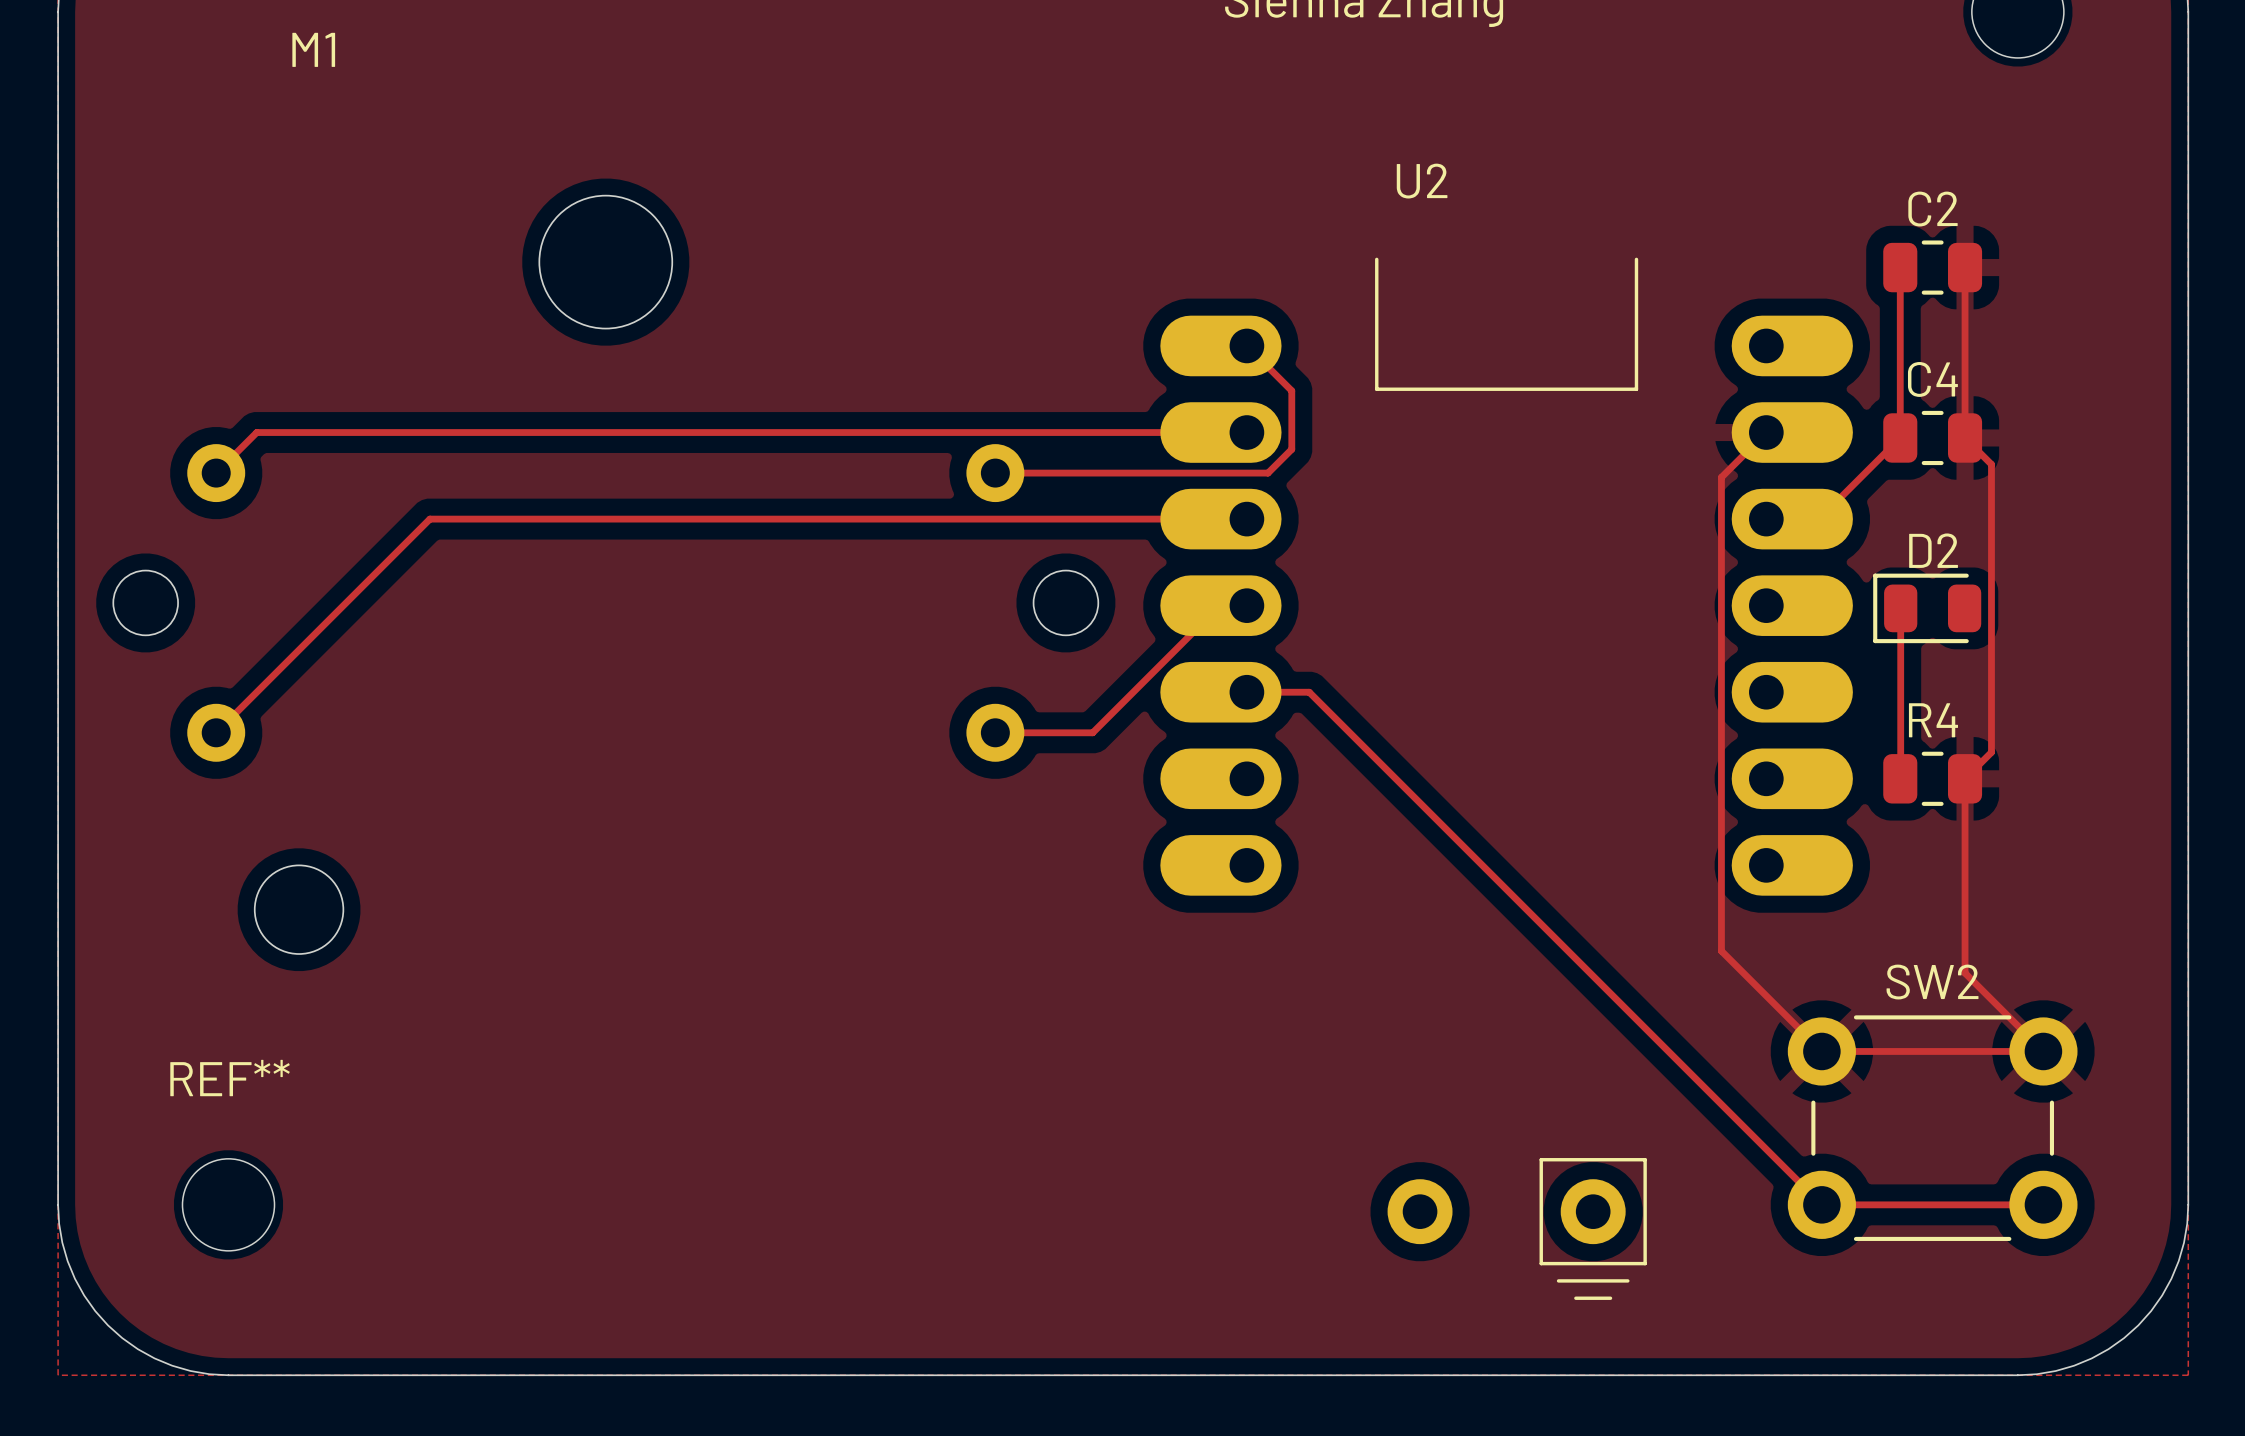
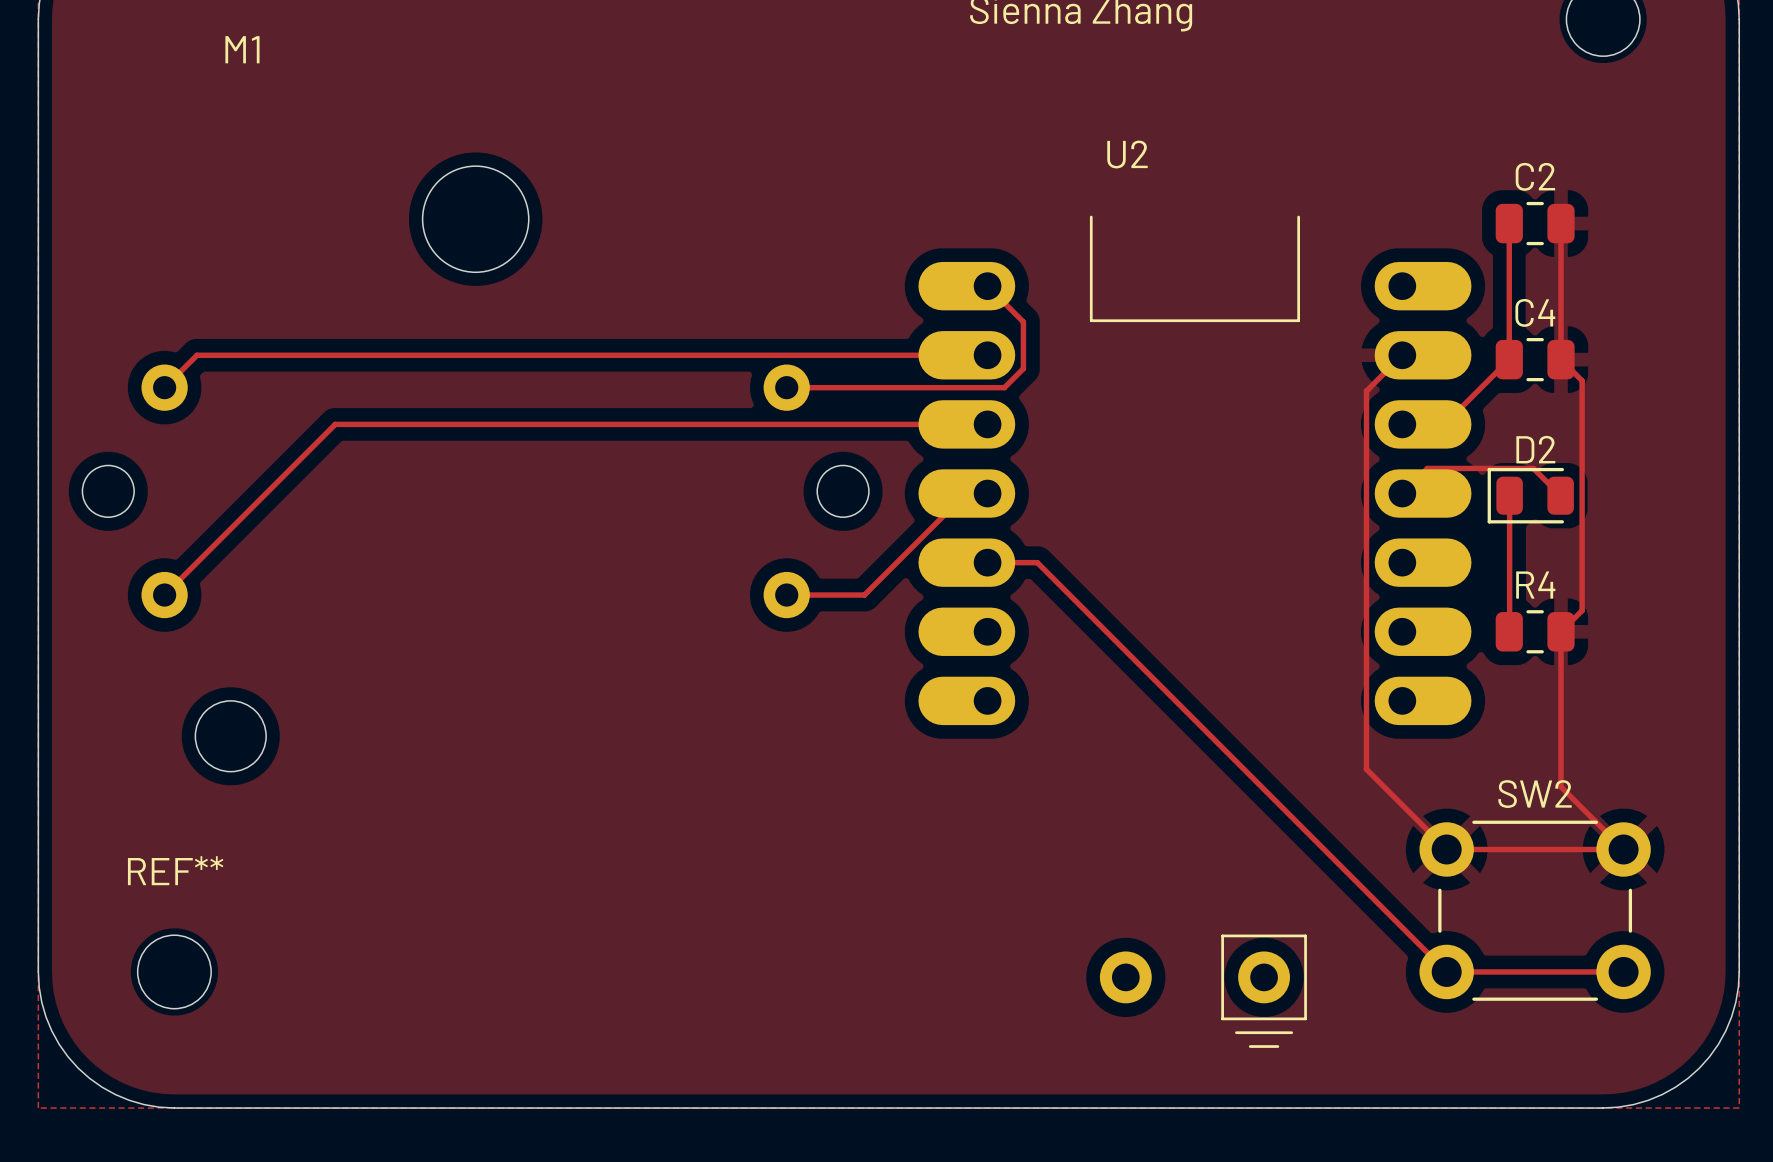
track: none -> (1402, 493) (1427, 468) (1533, 468) (1560, 495)

